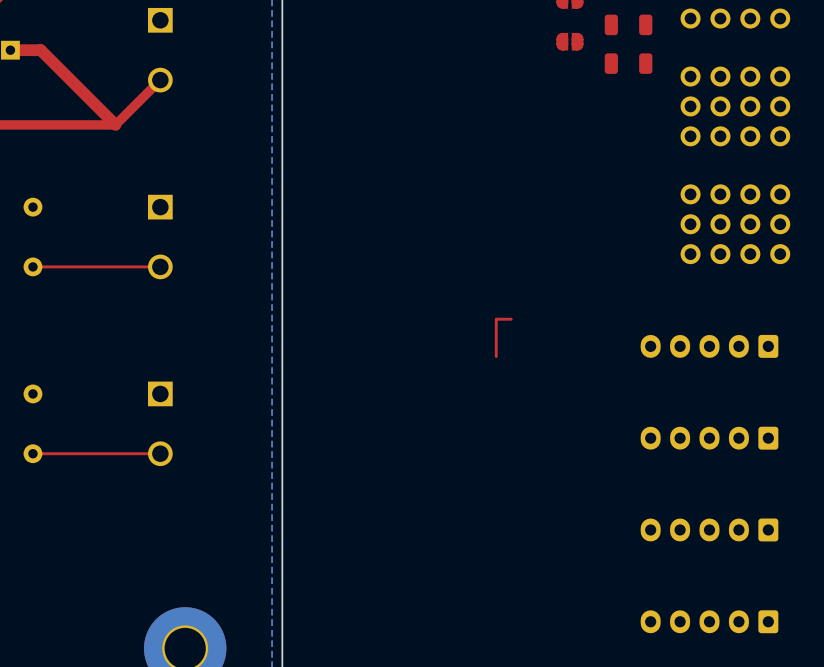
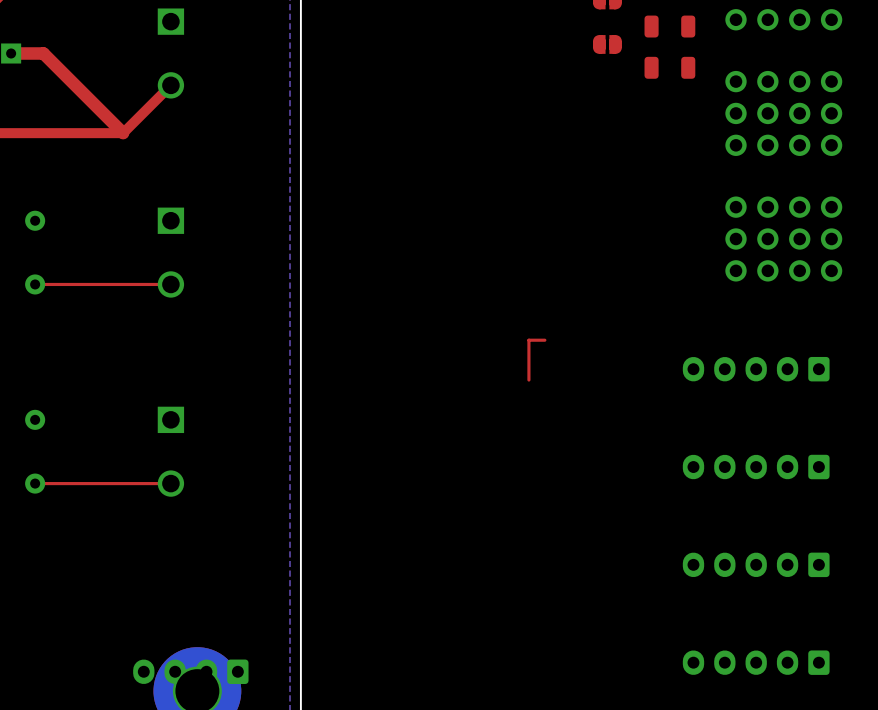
part: none -> (190, 671)

